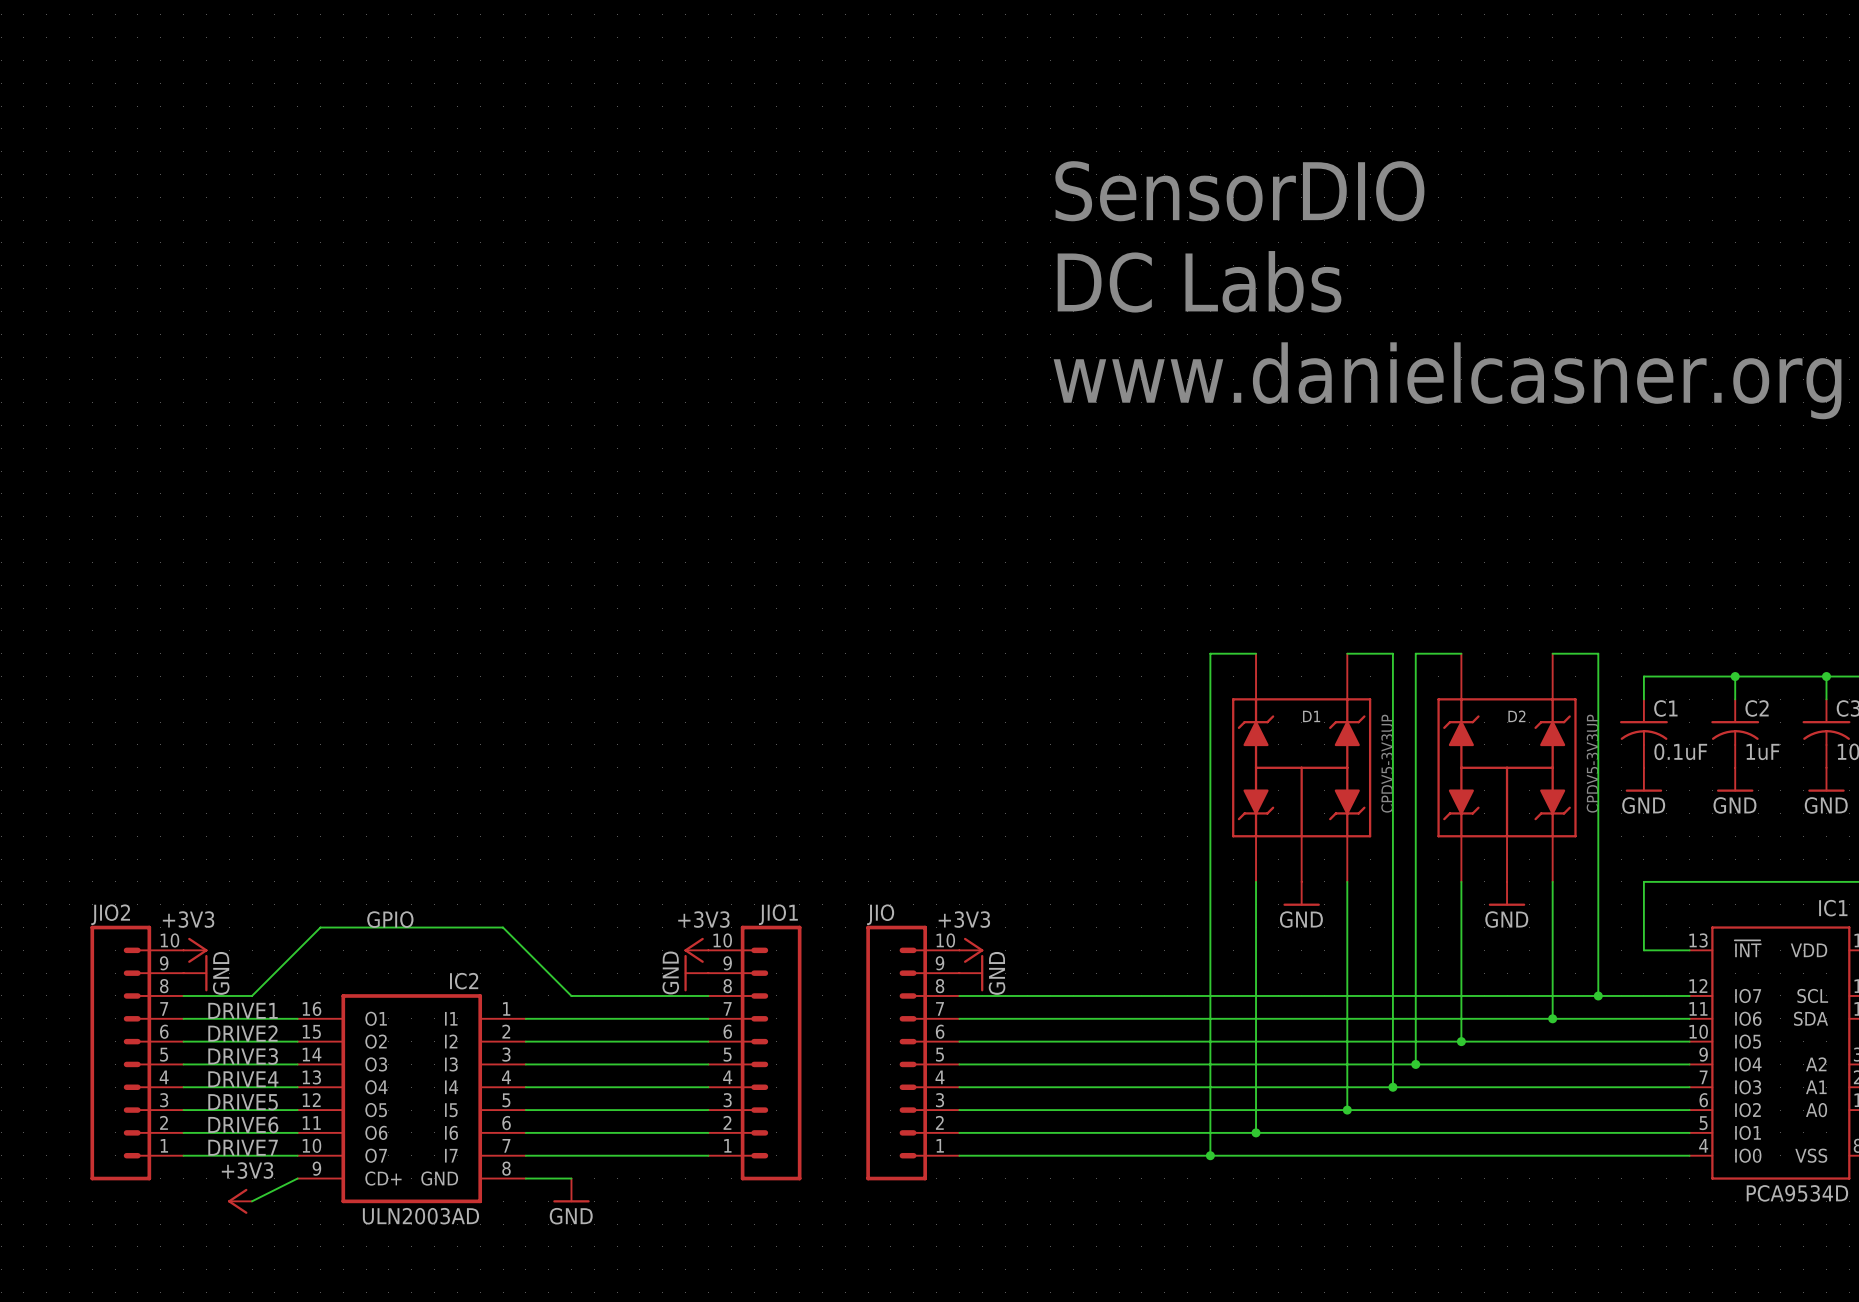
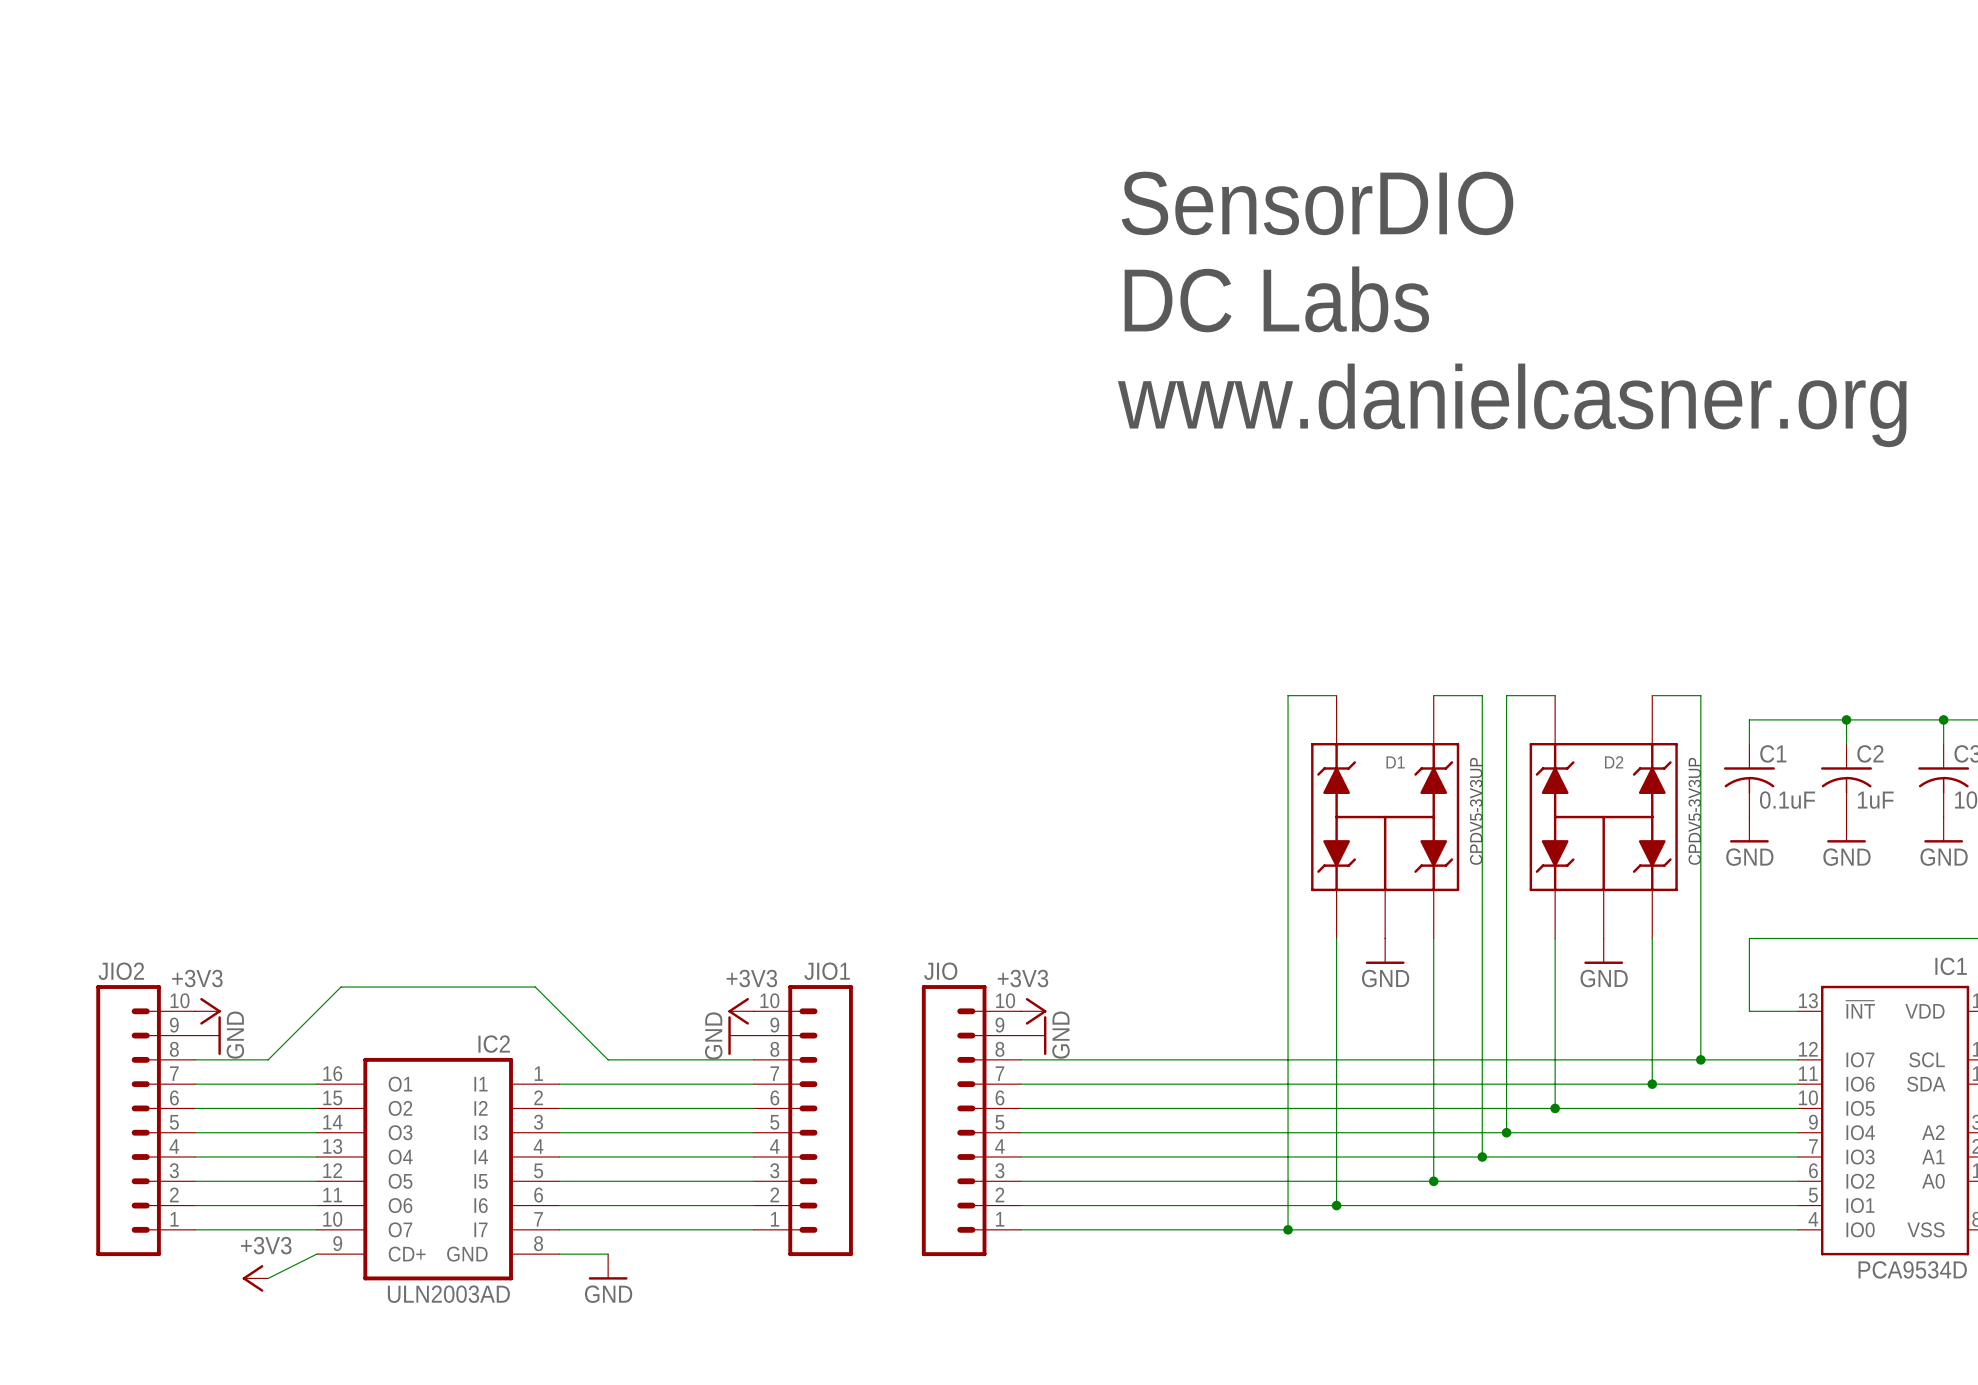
label: GPIO (390, 919) -> none
label: DRIVE1 (243, 1010) -> none
label: DRIVE2 (242, 1033) -> none
label: DRIVE3 (243, 1056) -> none
label: DRIVE4 (243, 1079) -> none
label: DRIVE5 (243, 1102) -> none
label: DRIVE6 (243, 1124) -> none
label: DRIVE7 (243, 1147) -> none

